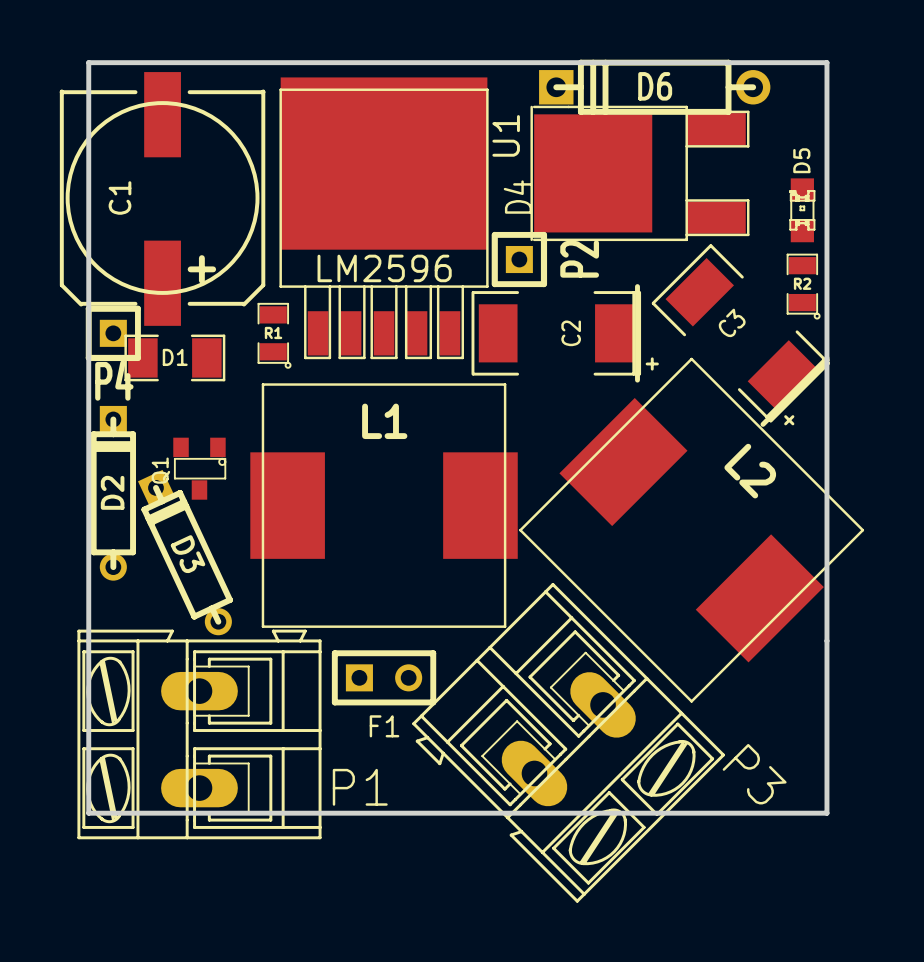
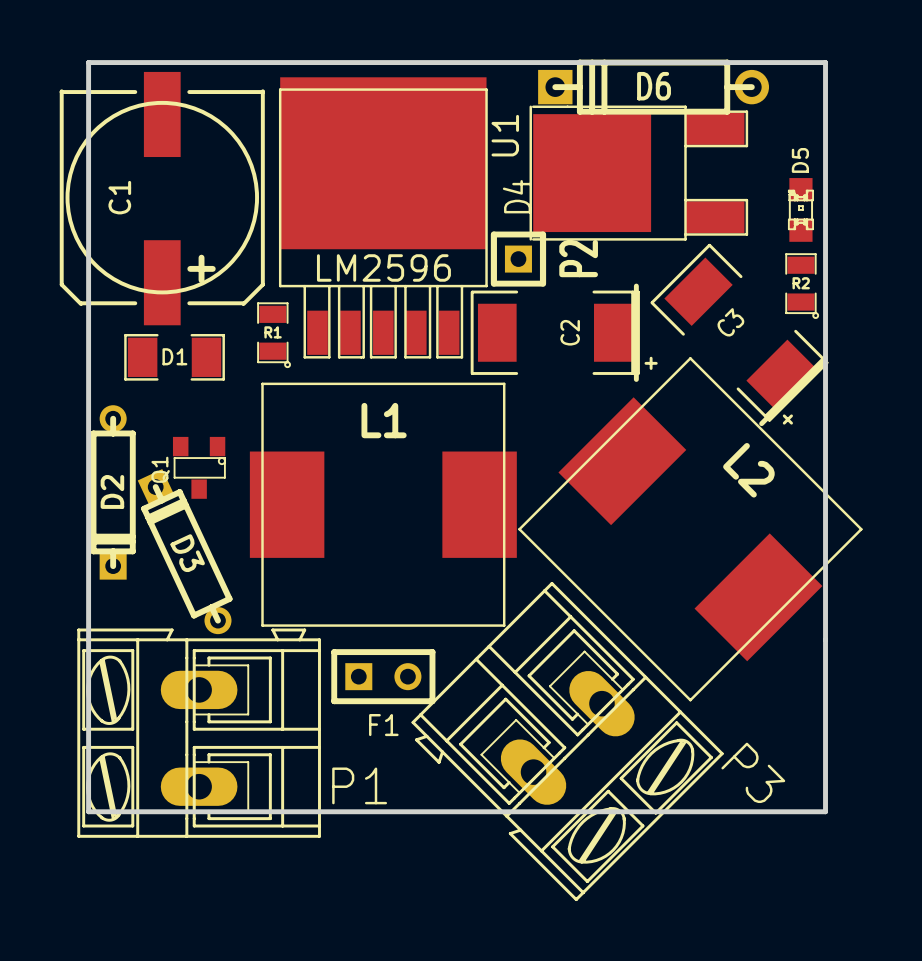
P4: (113, 333) -> none
D2 rotation: 0° (113, 493) -> 180° (113, 492)

